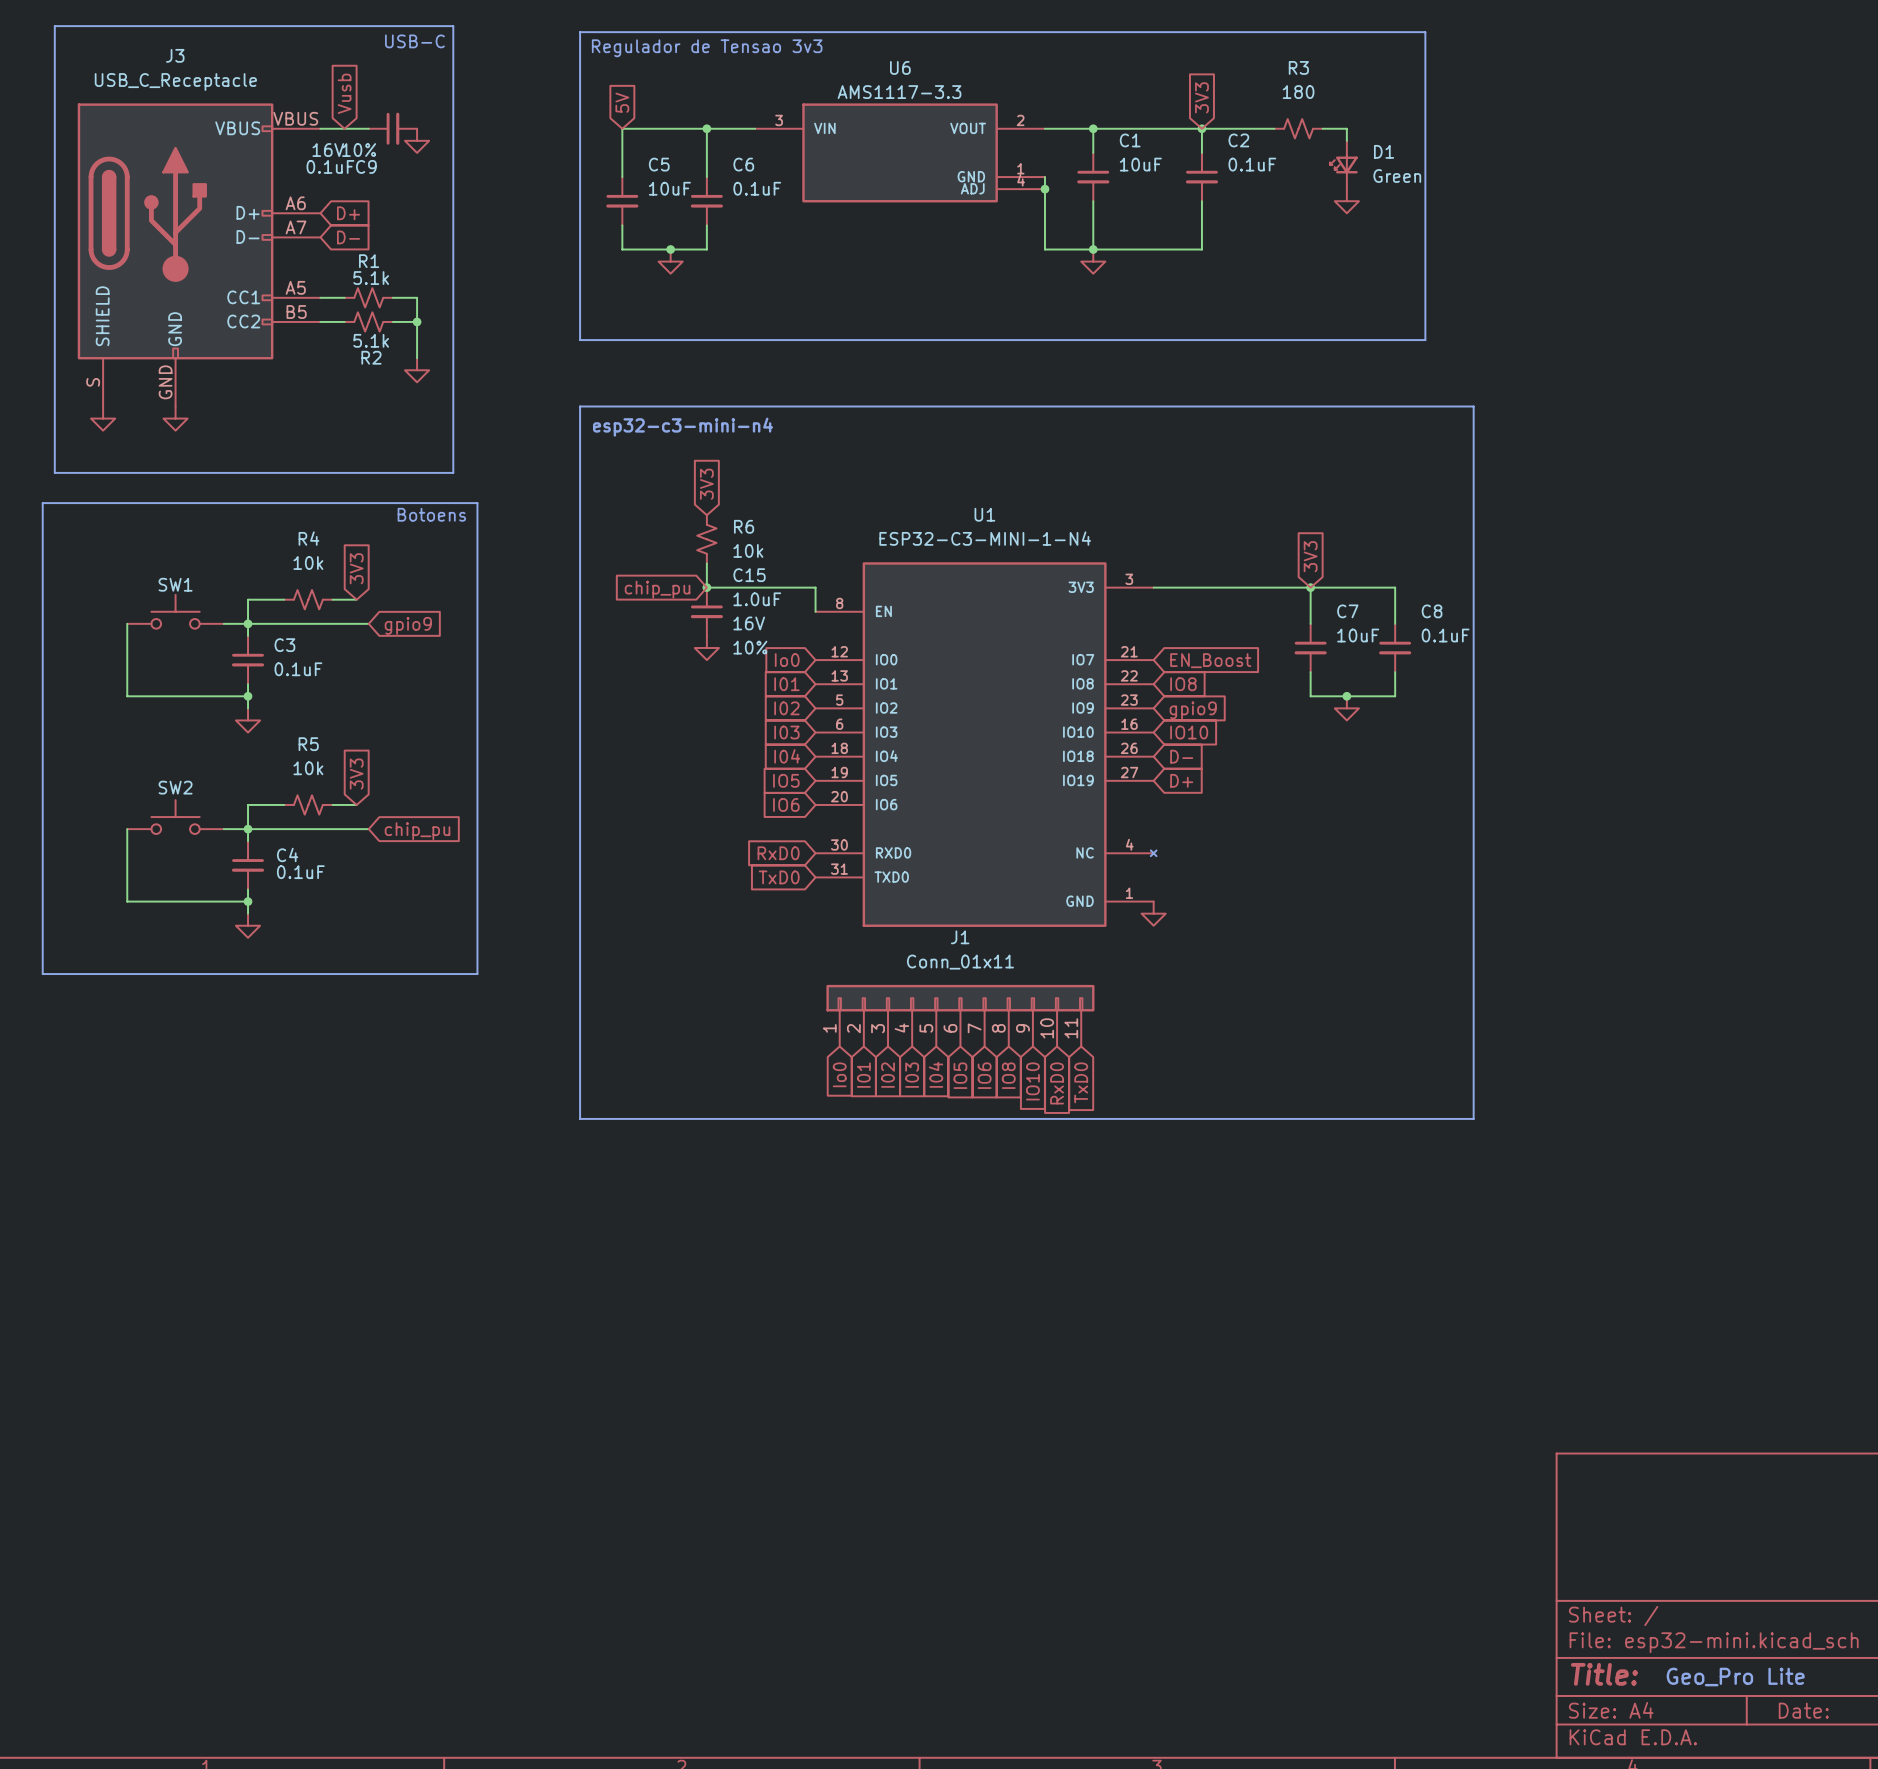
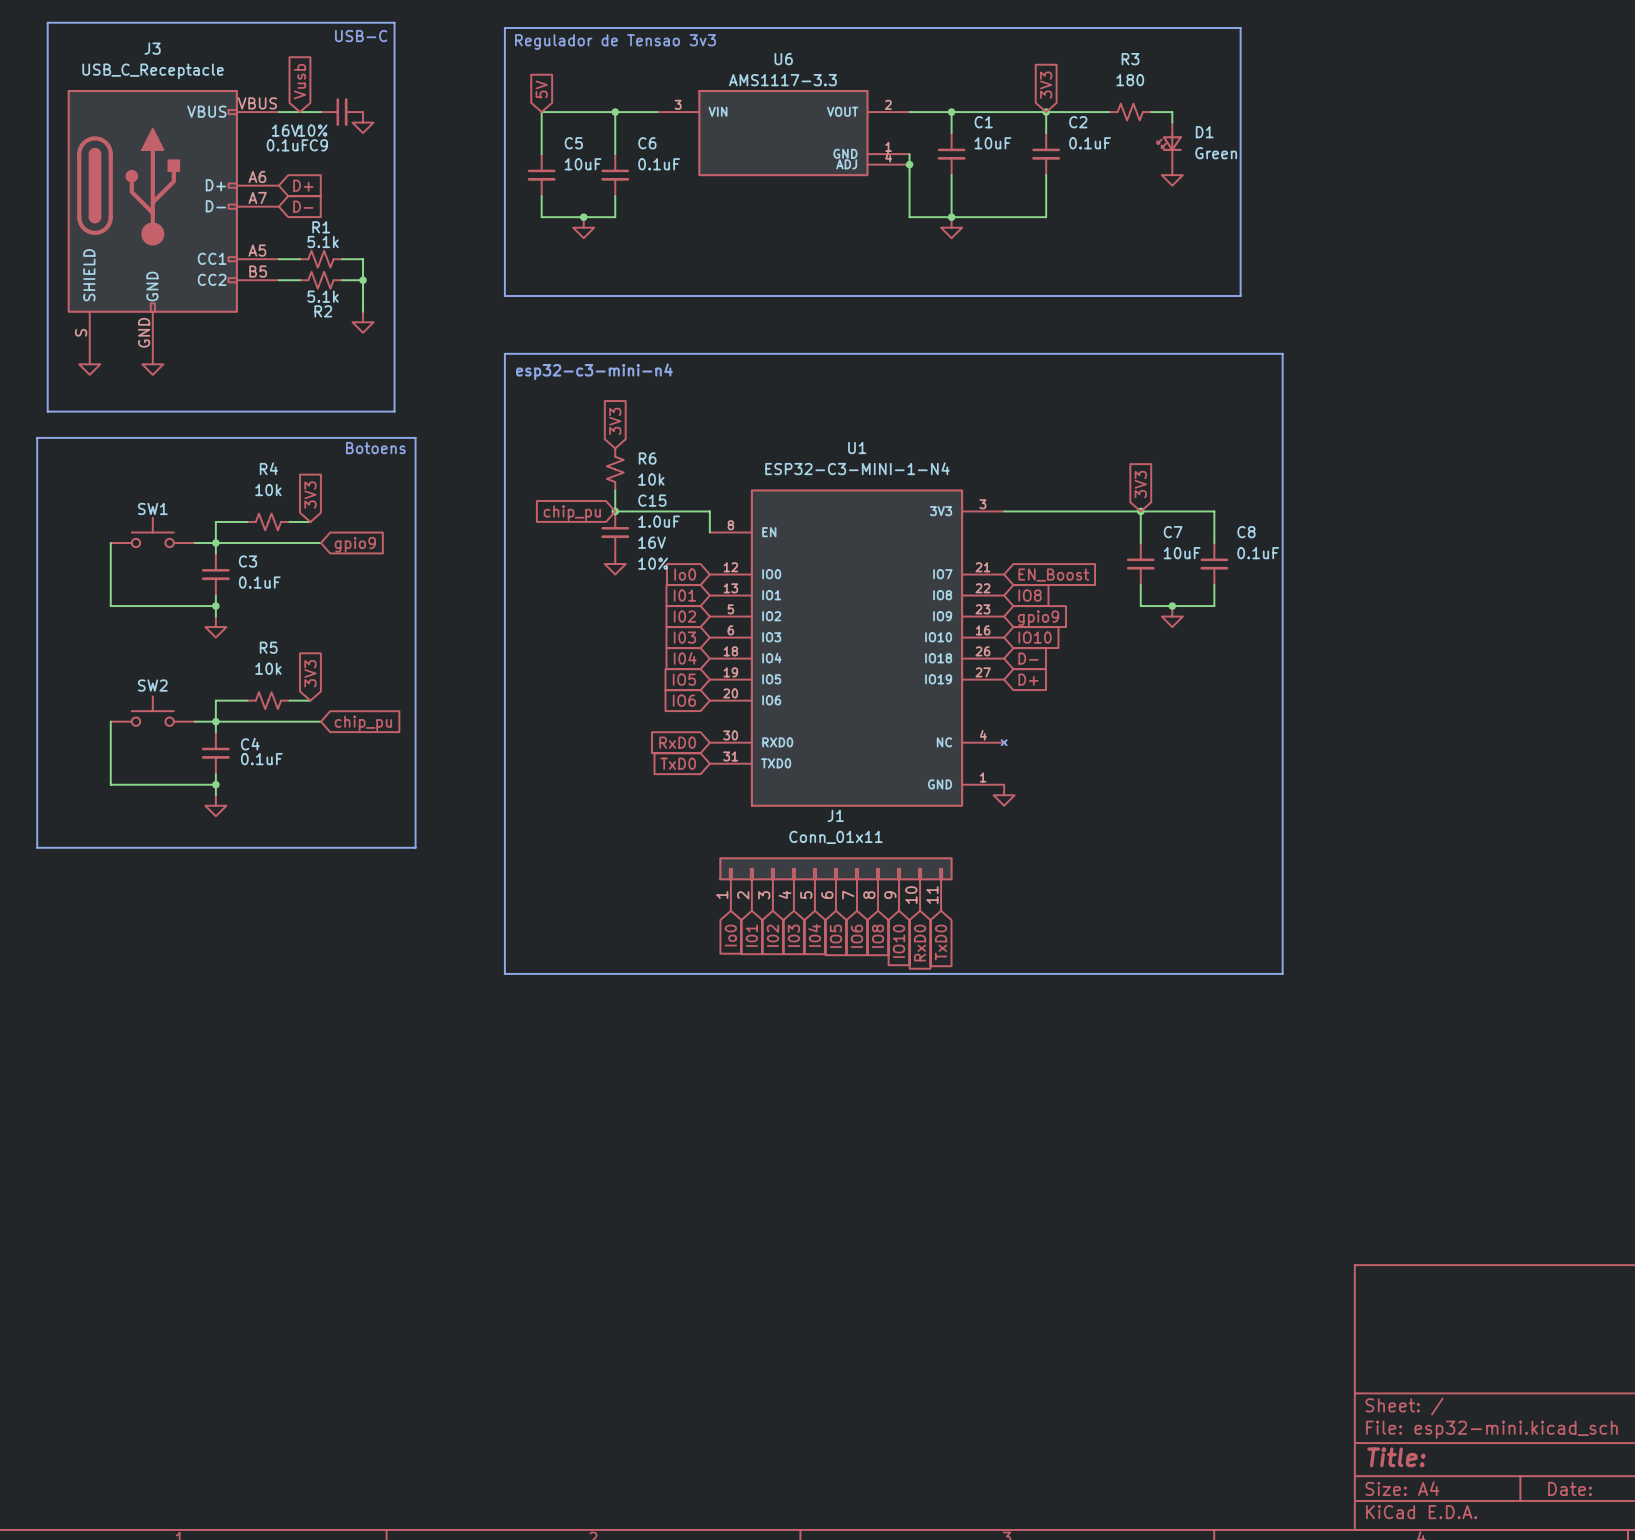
text: Geo_Pro Lite (1735, 1677) -> none

